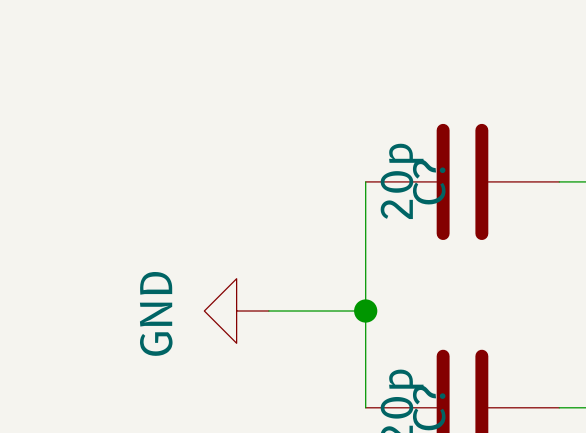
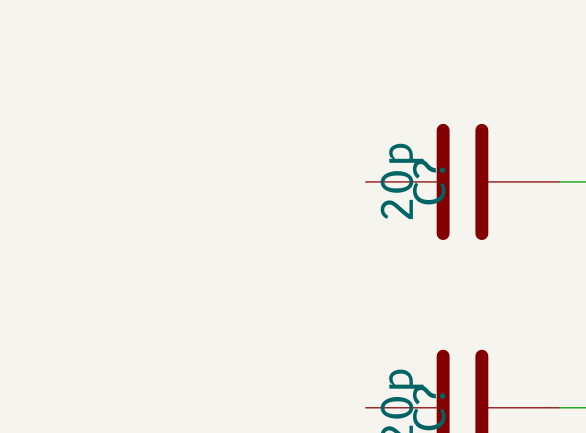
wire: (365, 181) (365, 407) -> none
power symbol: GND (236, 311) -> none
wire: (268, 311) (365, 311) -> none
junction: (365, 311) -> none

